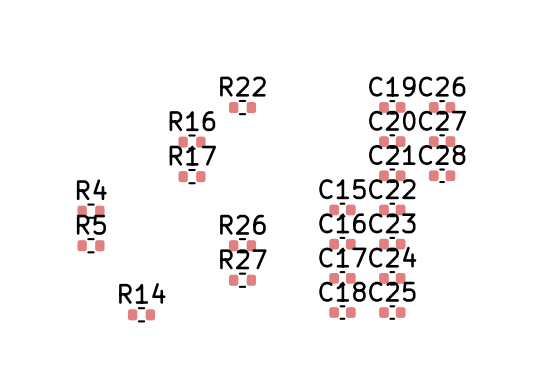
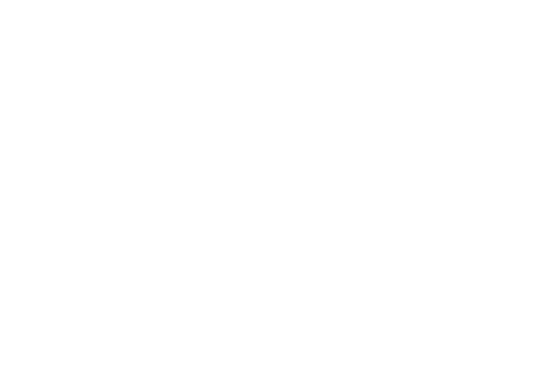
R22: (242, 107) -> none
C19: (392, 107) -> none
C26: (442, 107) -> none
C20: (392, 141) -> none
C27: (442, 141) -> none
R16: (192, 142) -> none
C21: (392, 175) -> none
C28: (442, 175) -> none
R17: (192, 176) -> none
C15: (342, 209) -> none
C22: (392, 209) -> none
R4: (90, 211) -> none
C16: (342, 244) -> none
C23: (392, 244) -> none
R5: (90, 245) -> none
R26: (242, 245) -> none
C17: (342, 278) -> none
C24: (392, 278) -> none
R27: (242, 280) -> none
C18: (342, 312) -> none
C25: (392, 312) -> none
R14: (141, 314) -> none

